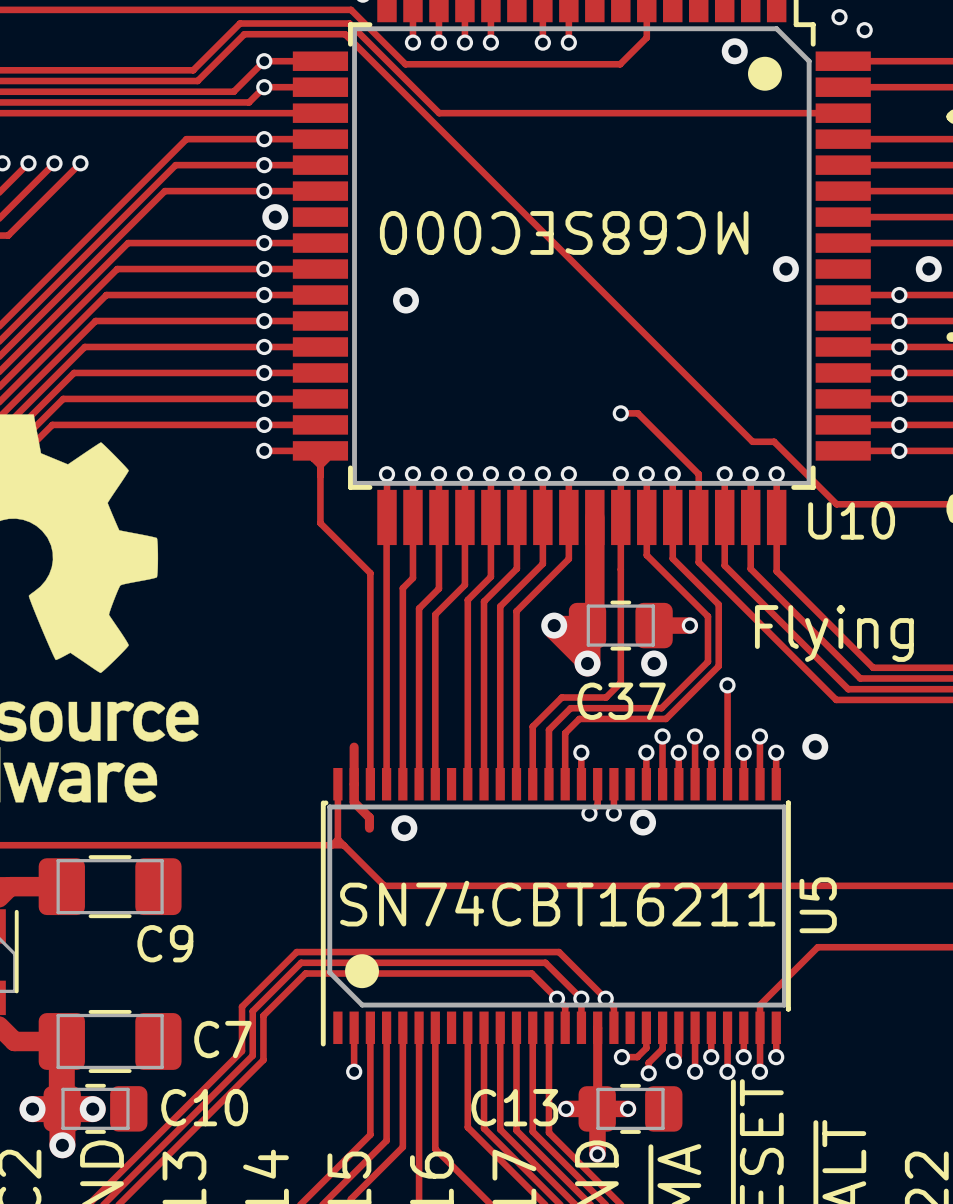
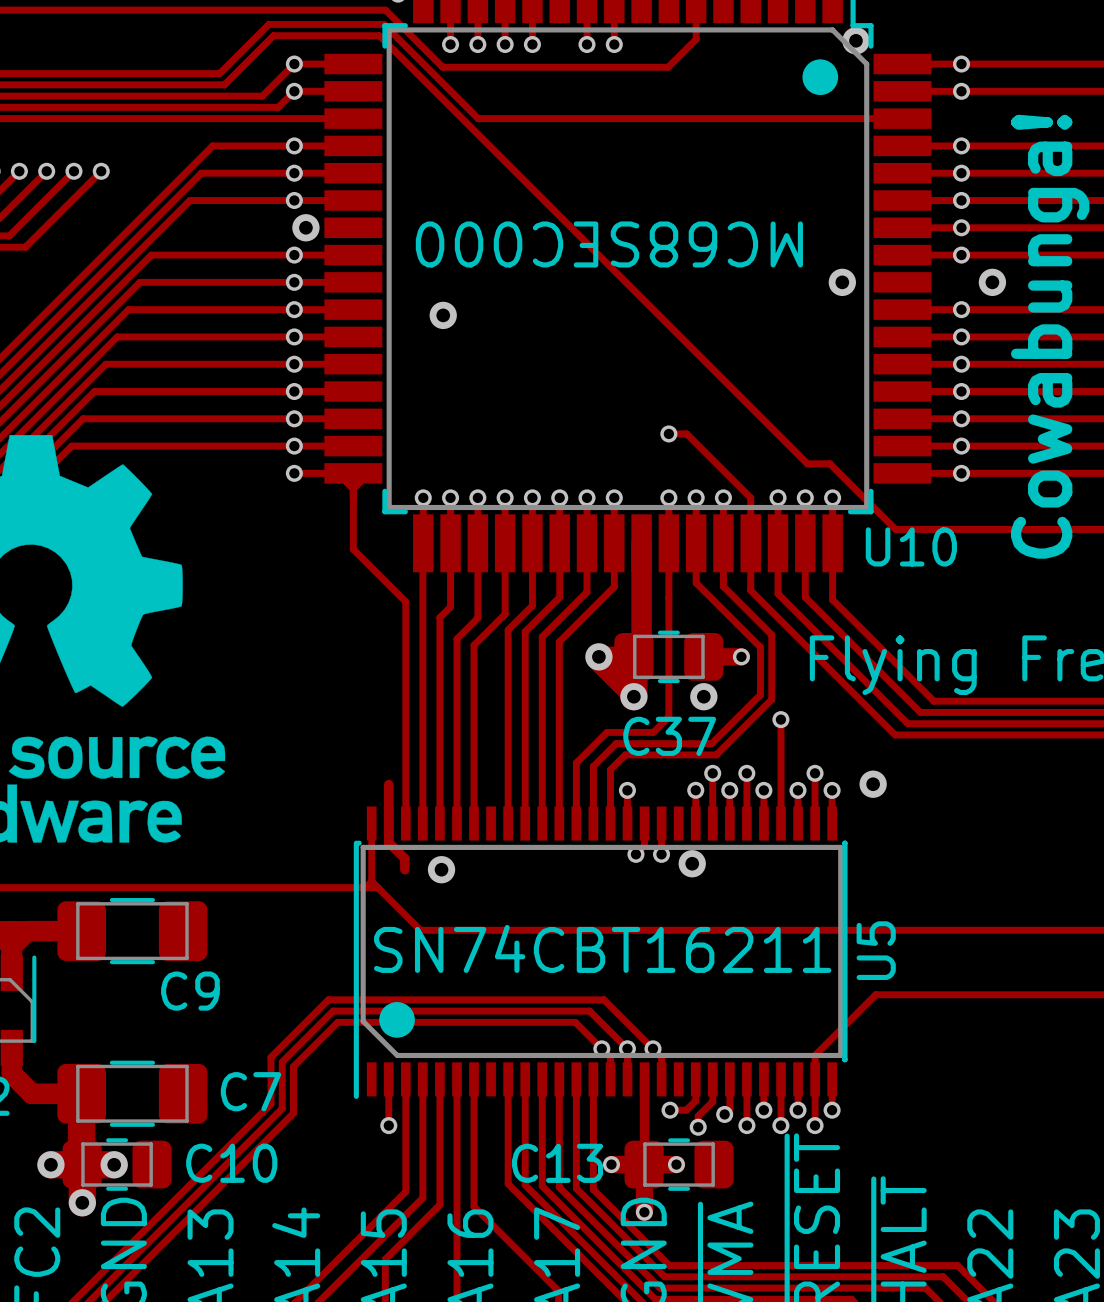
via: (839, 17) -> none
via: (864, 30) -> none
via position: (734, 51) -> (855, 40)
via: none -> (961, 64)
via: none -> (961, 91)
via: none -> (961, 145)
via: none -> (961, 173)
via: none -> (961, 200)
via: none -> (961, 227)
via: none -> (961, 255)

